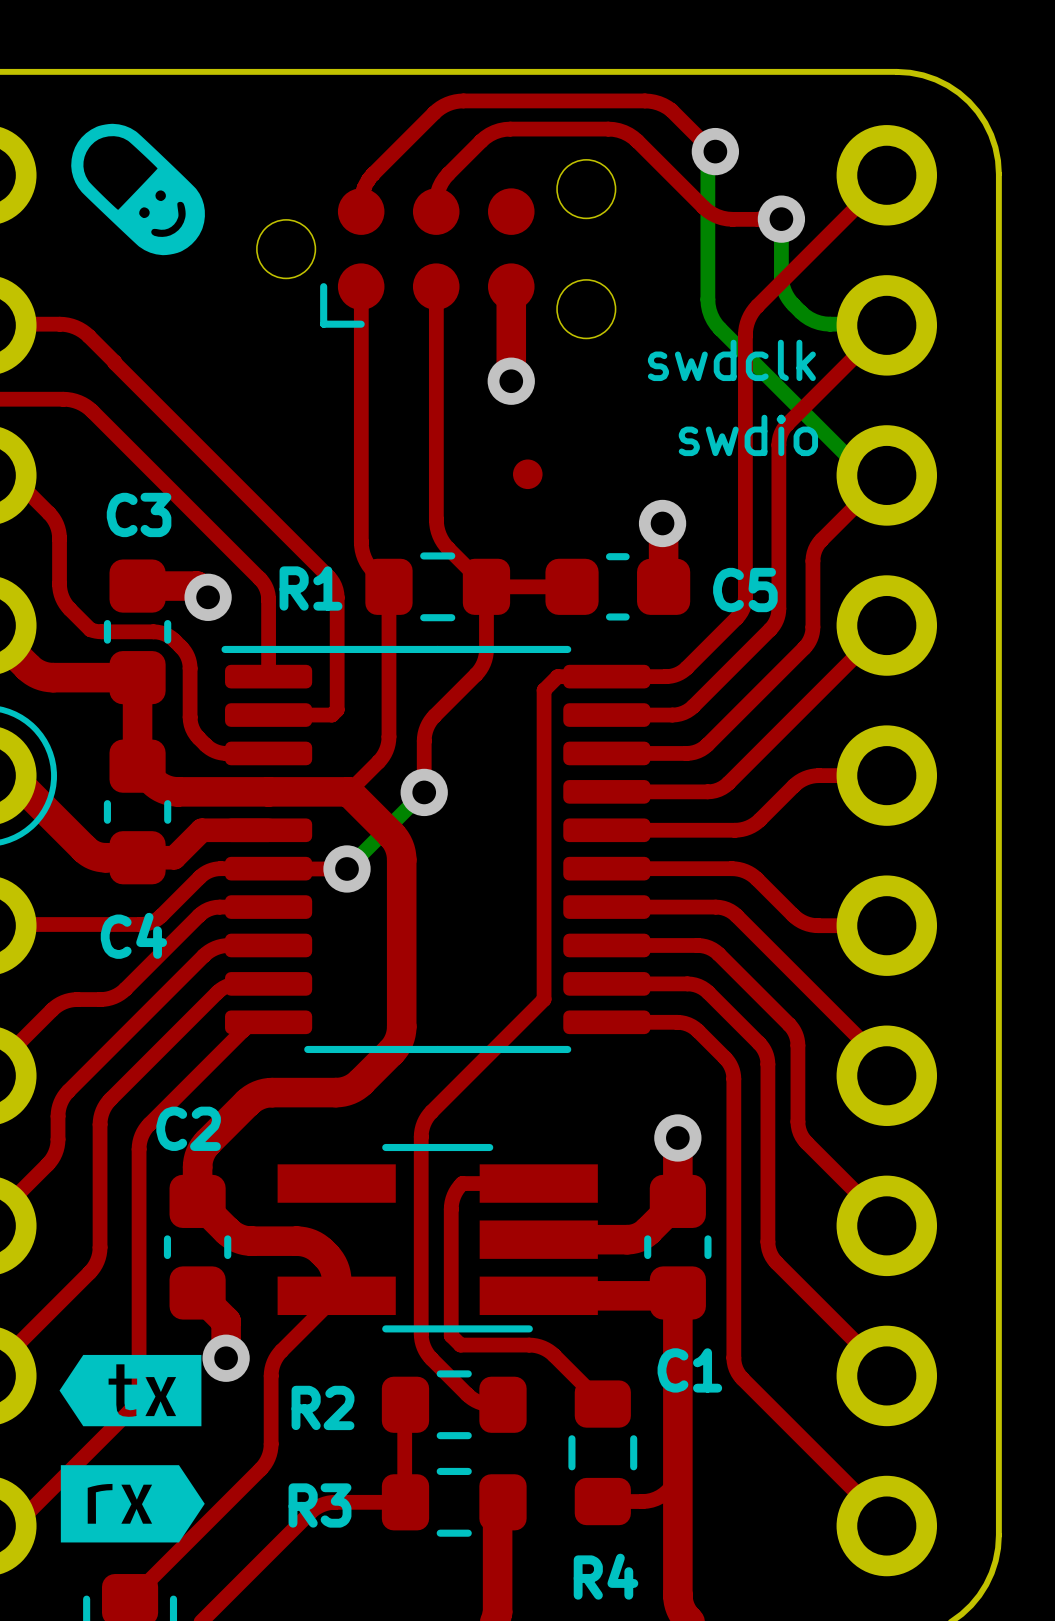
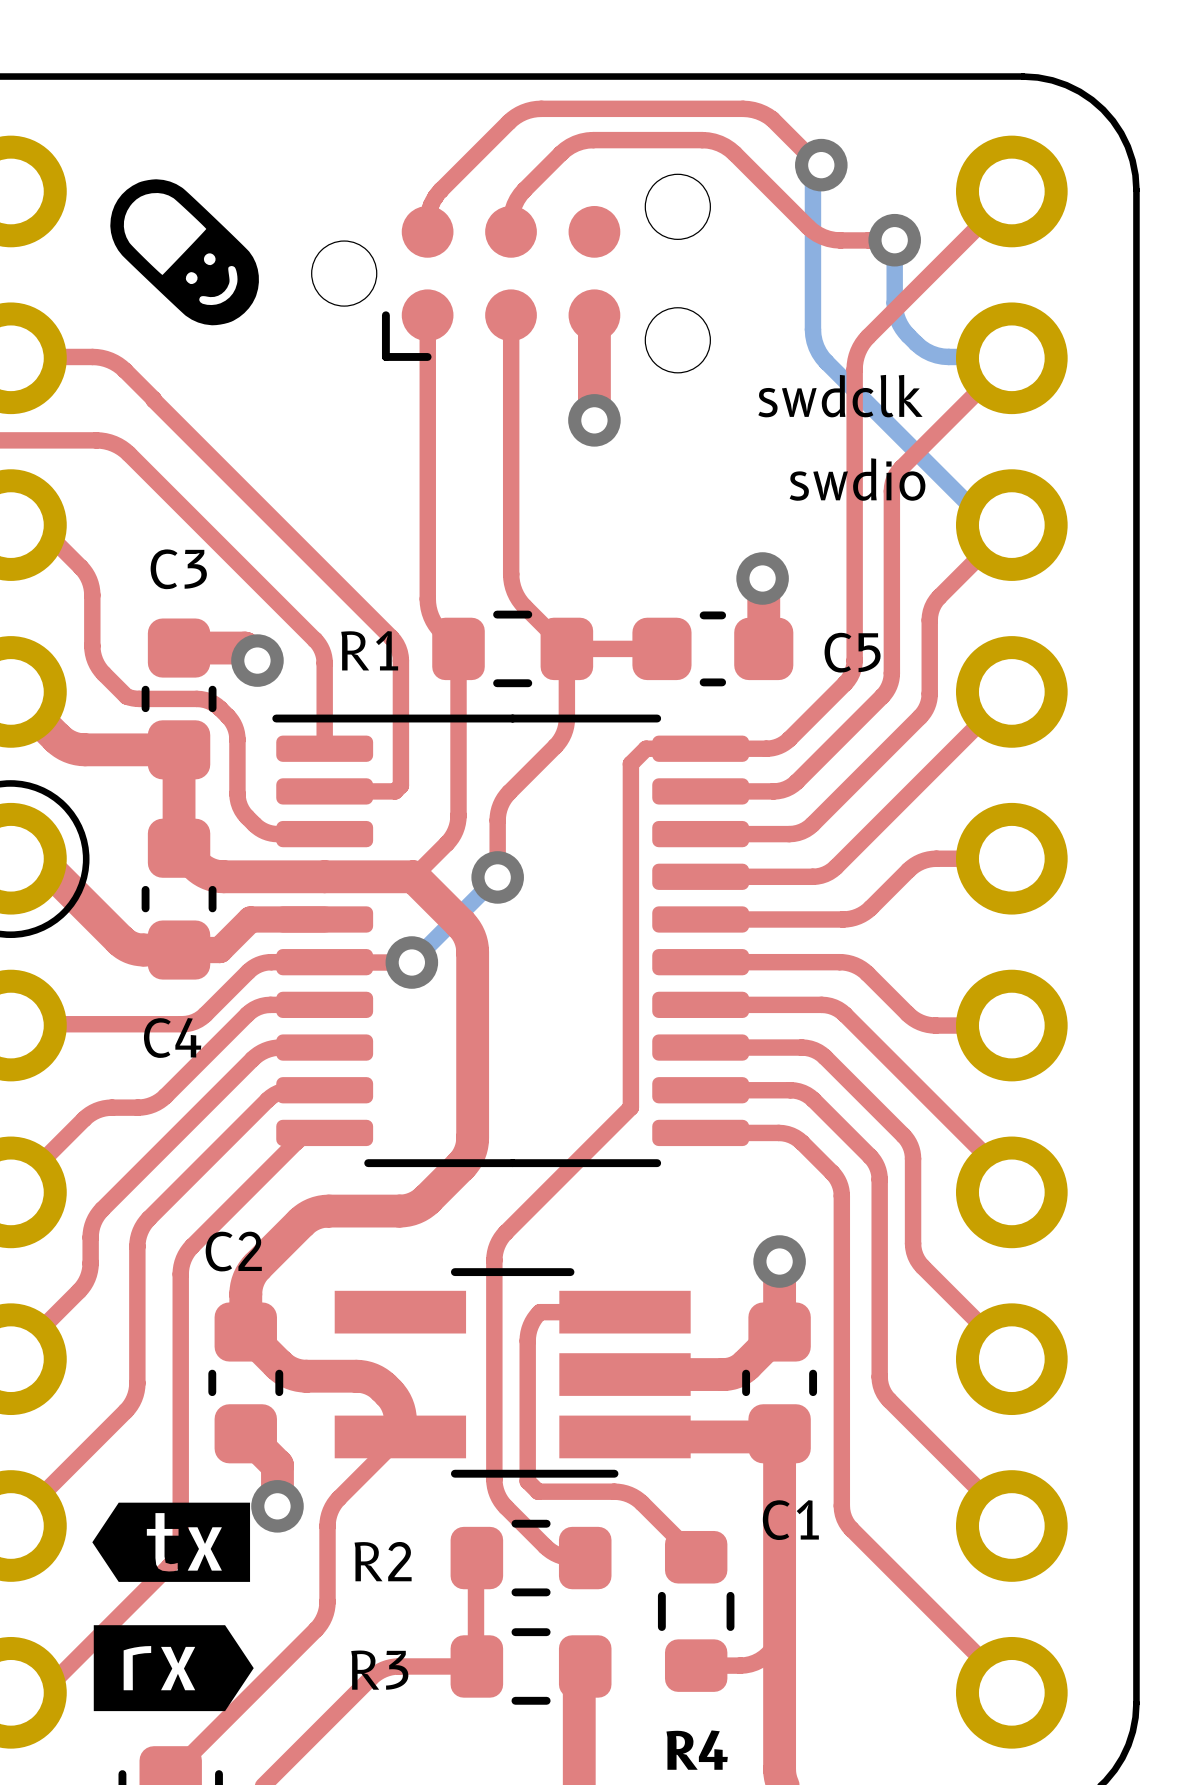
drawing position: (138, 189) -> (184, 252)
part: (527, 474) -> none

